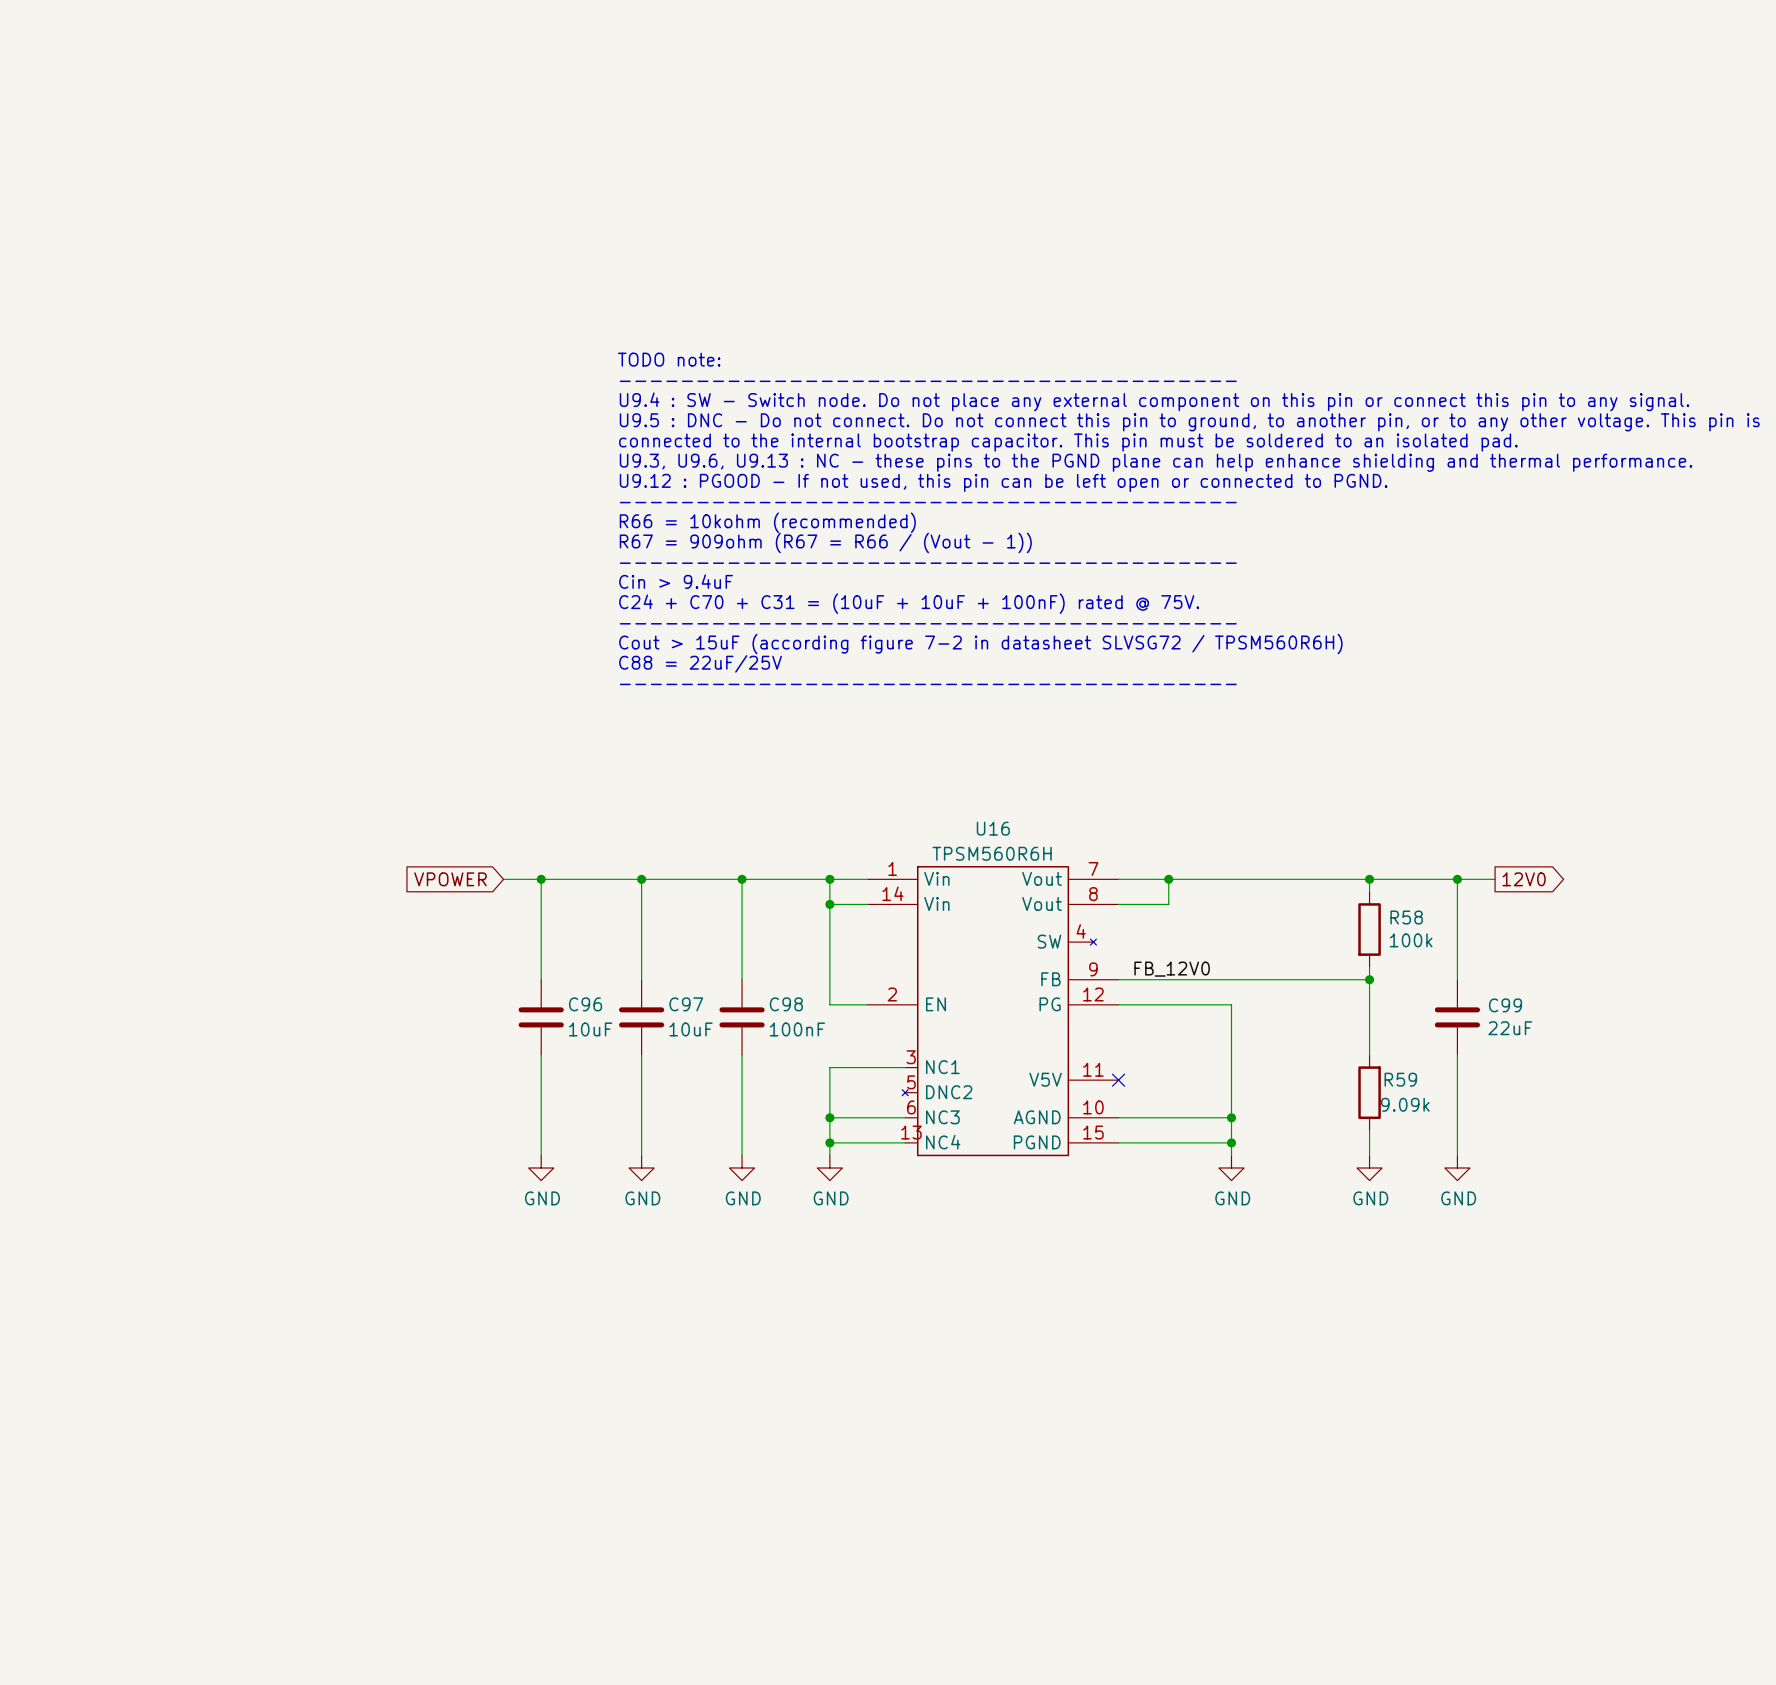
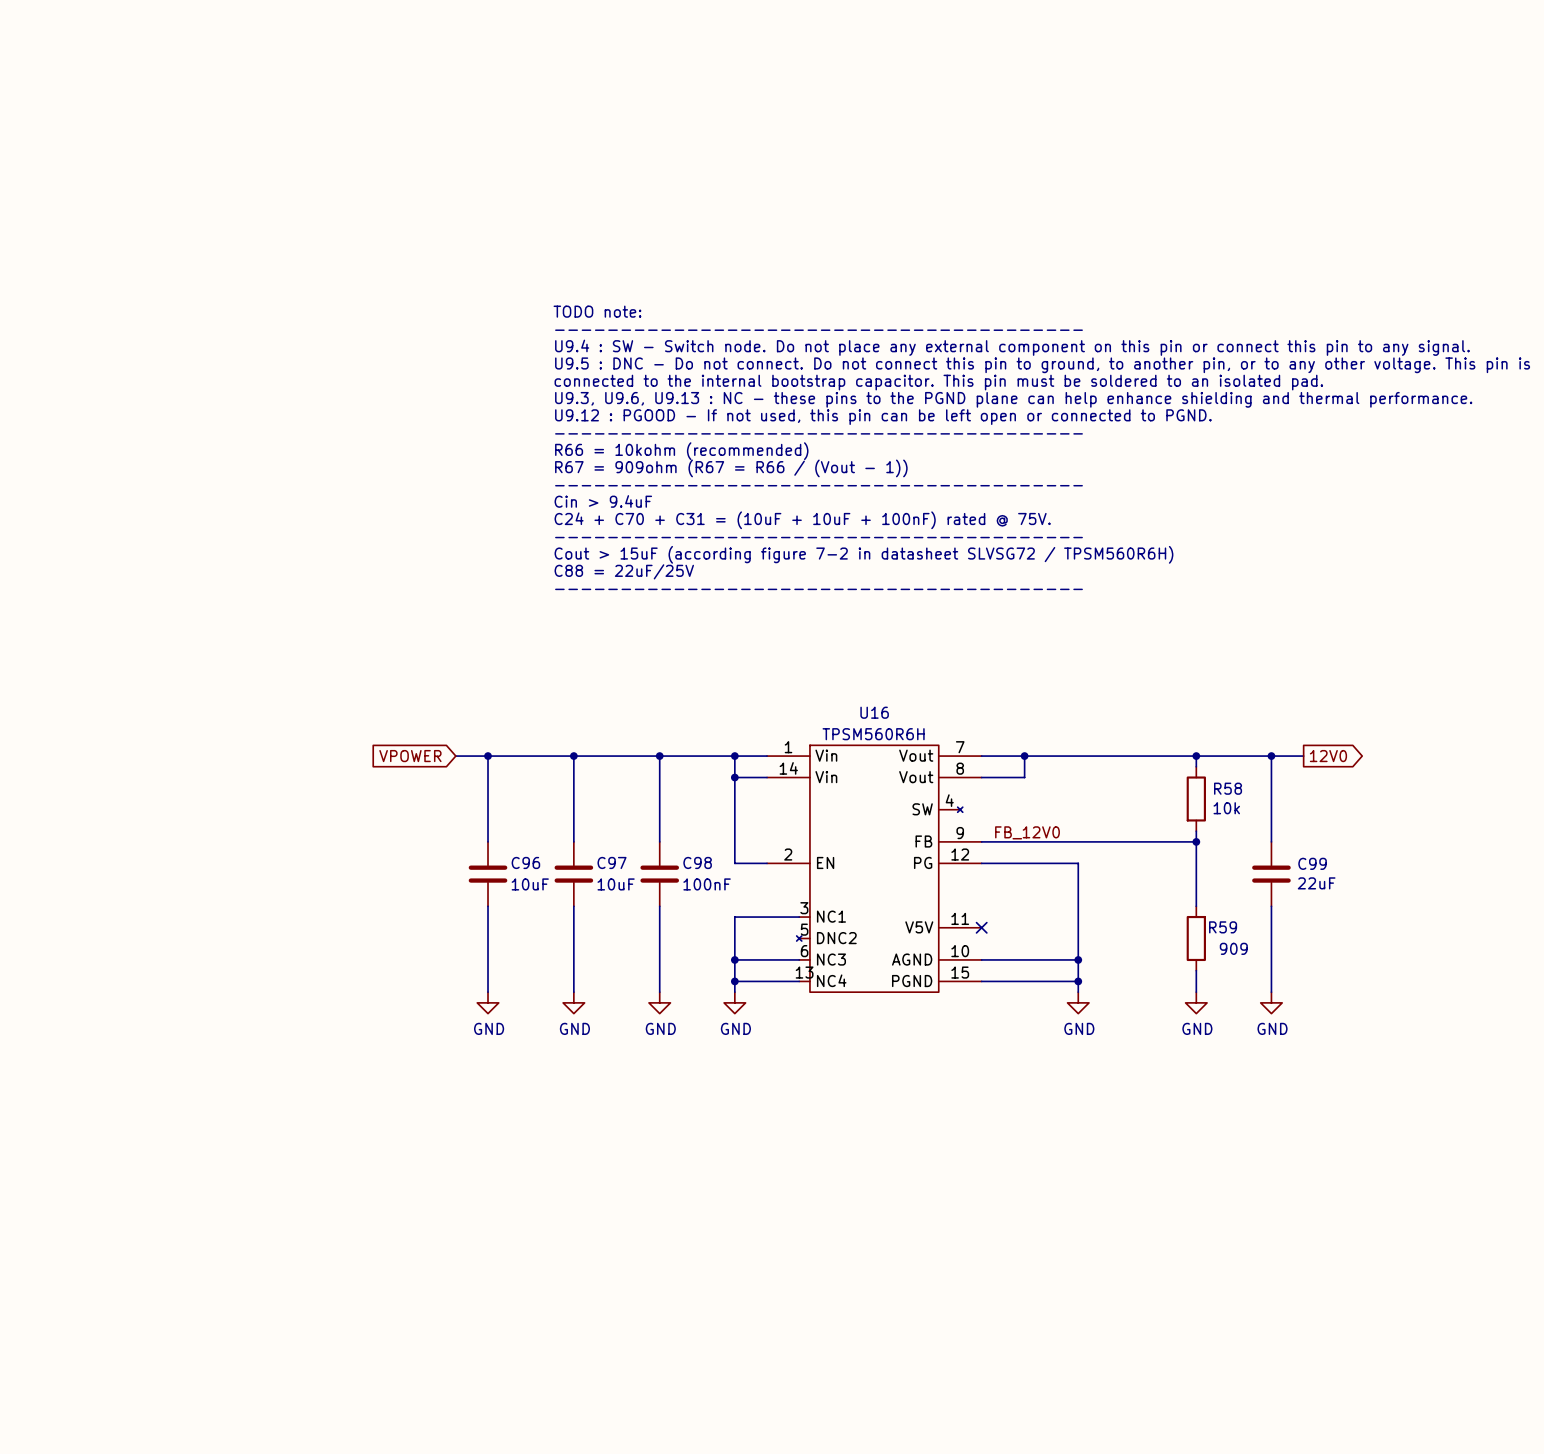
R58 value: 100k (1411, 940) -> 10k (1226, 808)
R59 value: 9.09k (1405, 1104) -> 909 (1233, 948)

